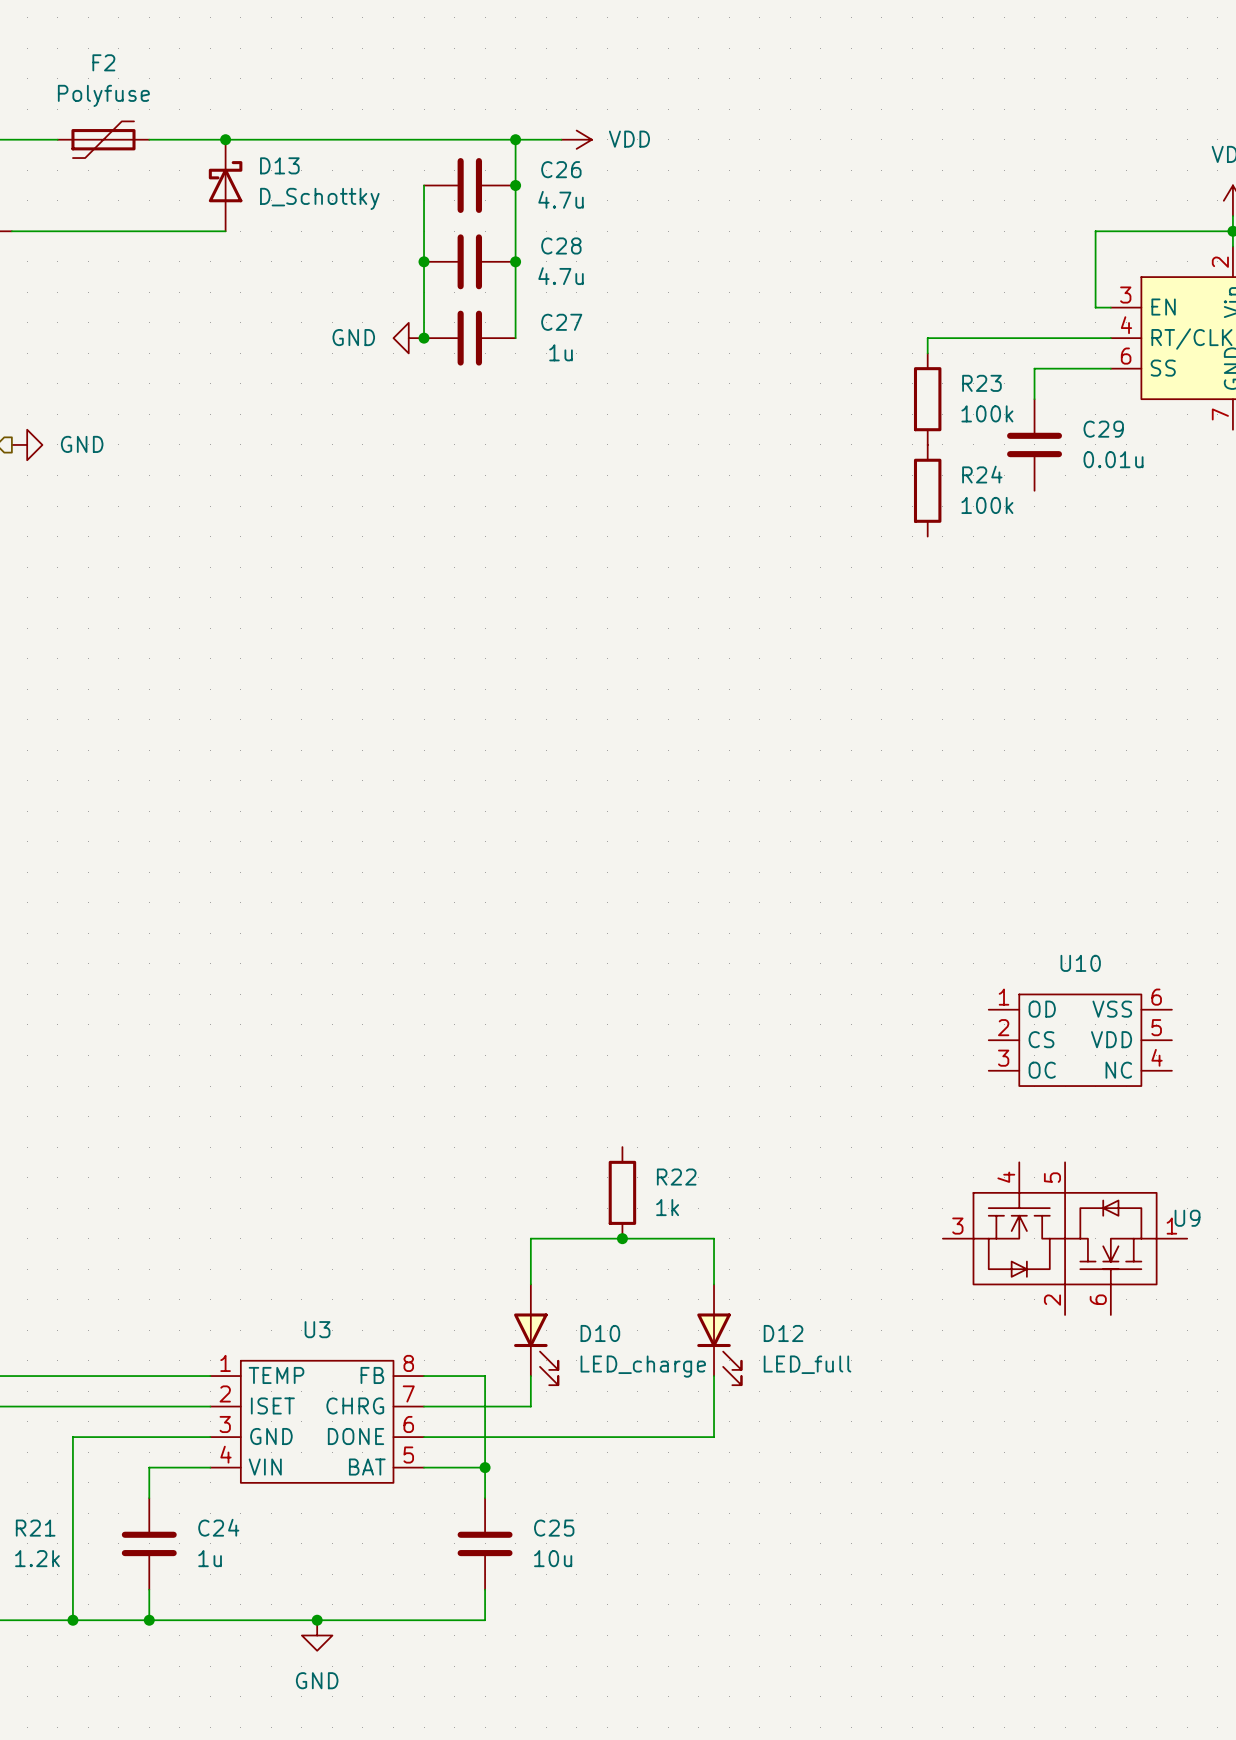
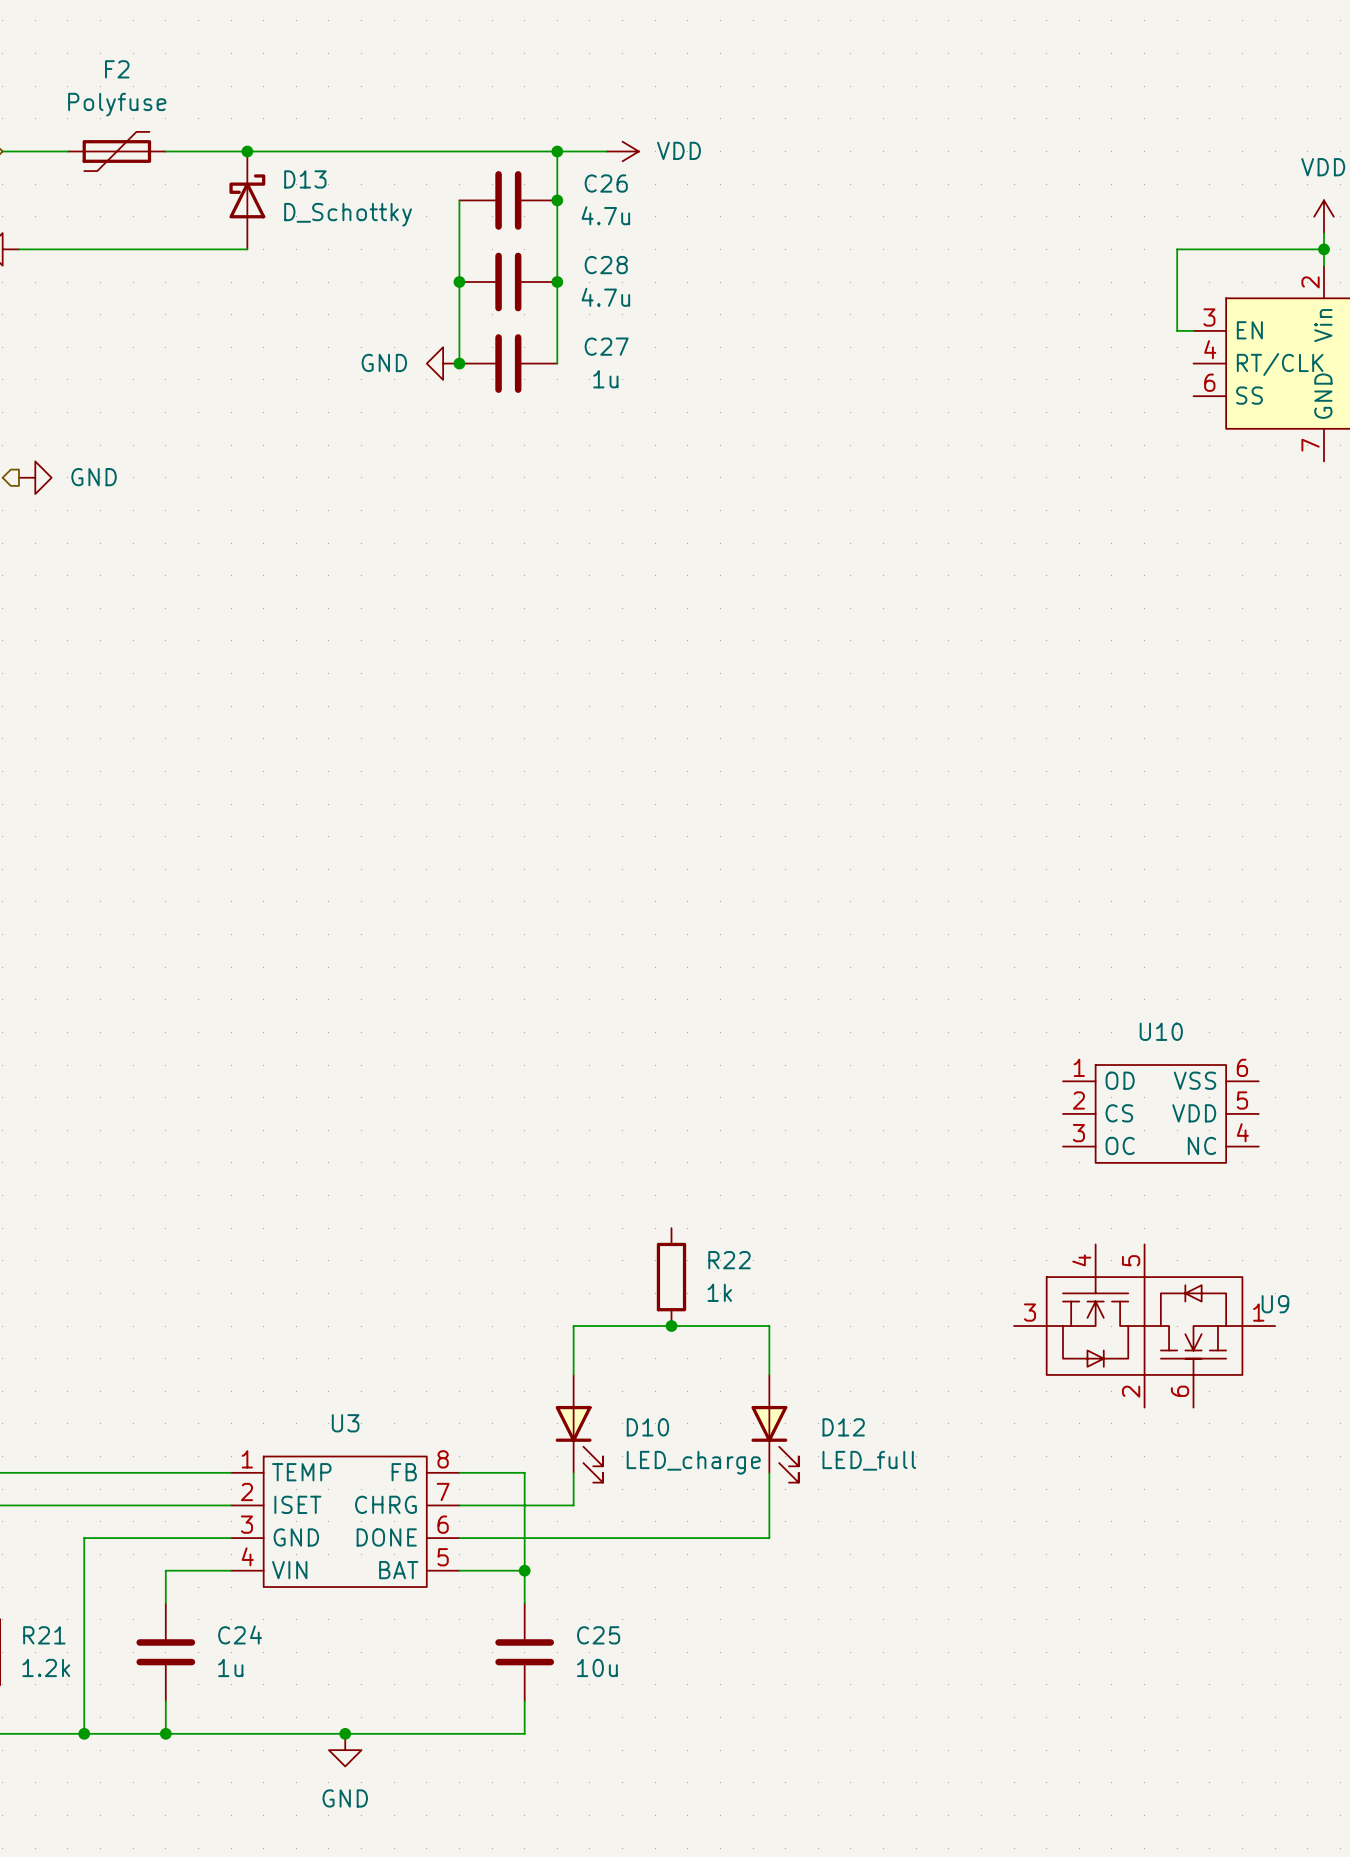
wire: (1110, 338) (927, 338) (927, 353) -> none
wire: (1110, 368) (1034, 368) (1034, 399) -> none
R23: 100k (927, 399) -> none
C29: 0.01u (1034, 444) -> none
R24: 100k (927, 490) -> none

